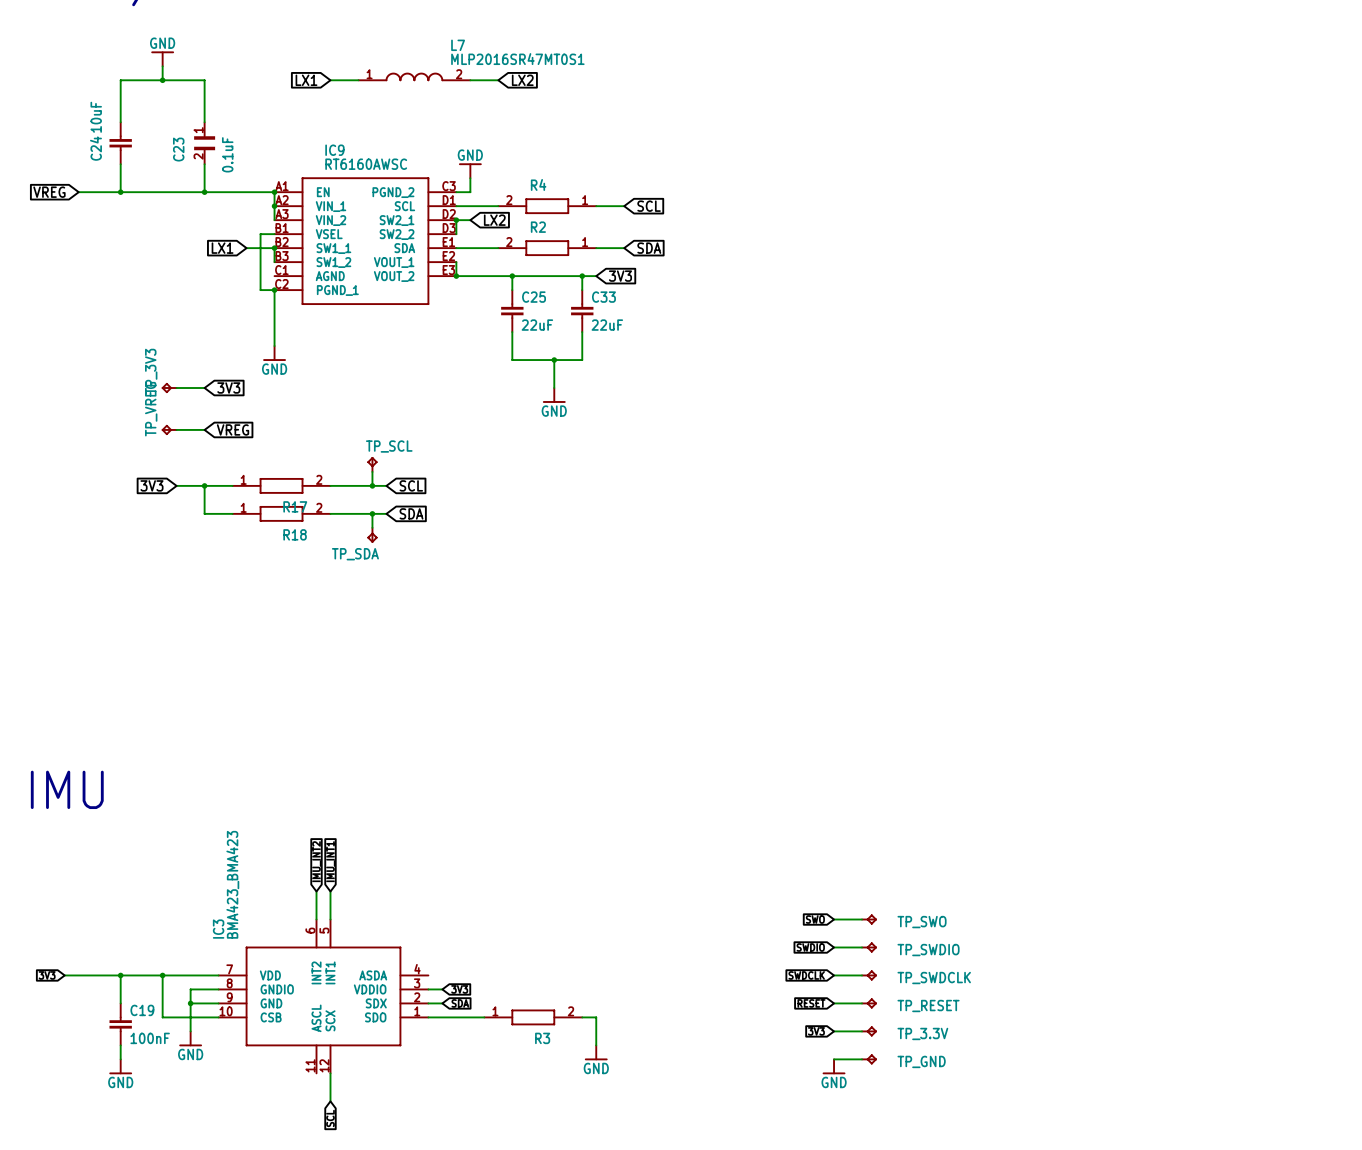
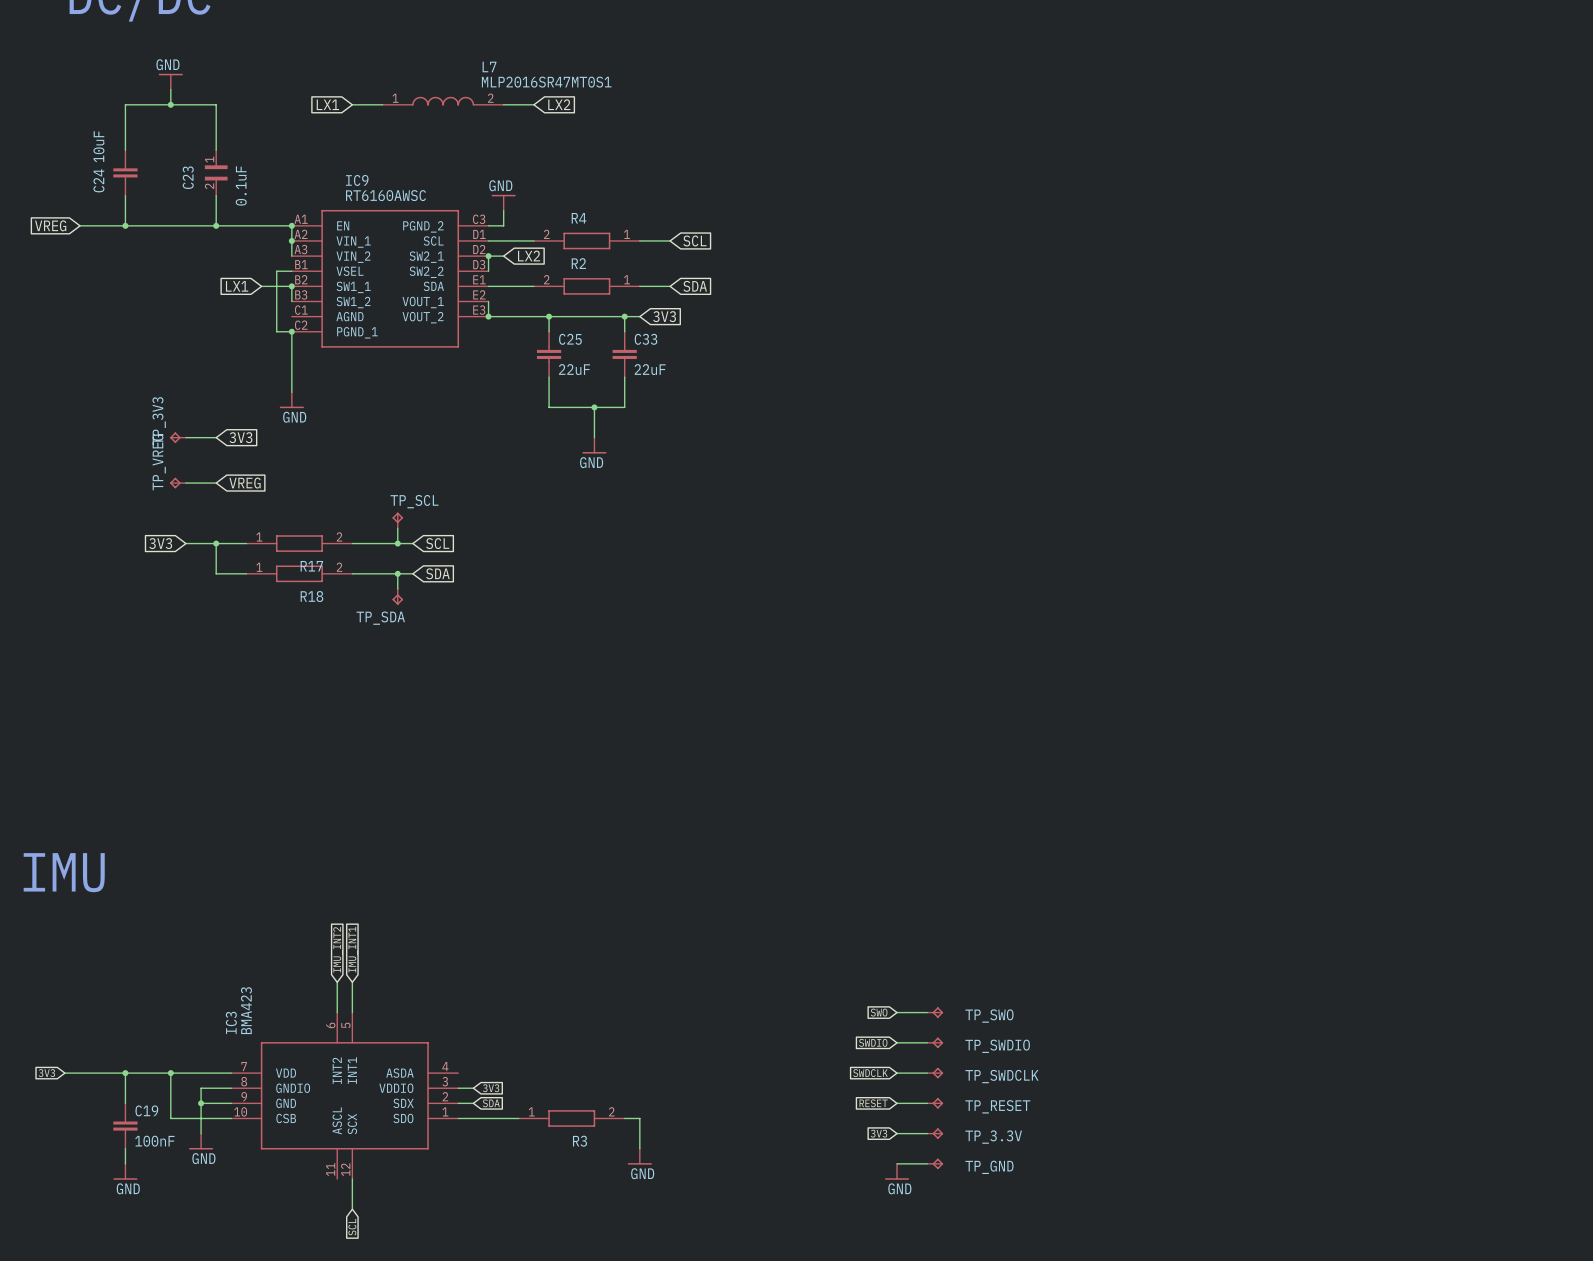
IC3 value: BMA423_BMA423 (232, 884) -> BMA423 (246, 1010)

